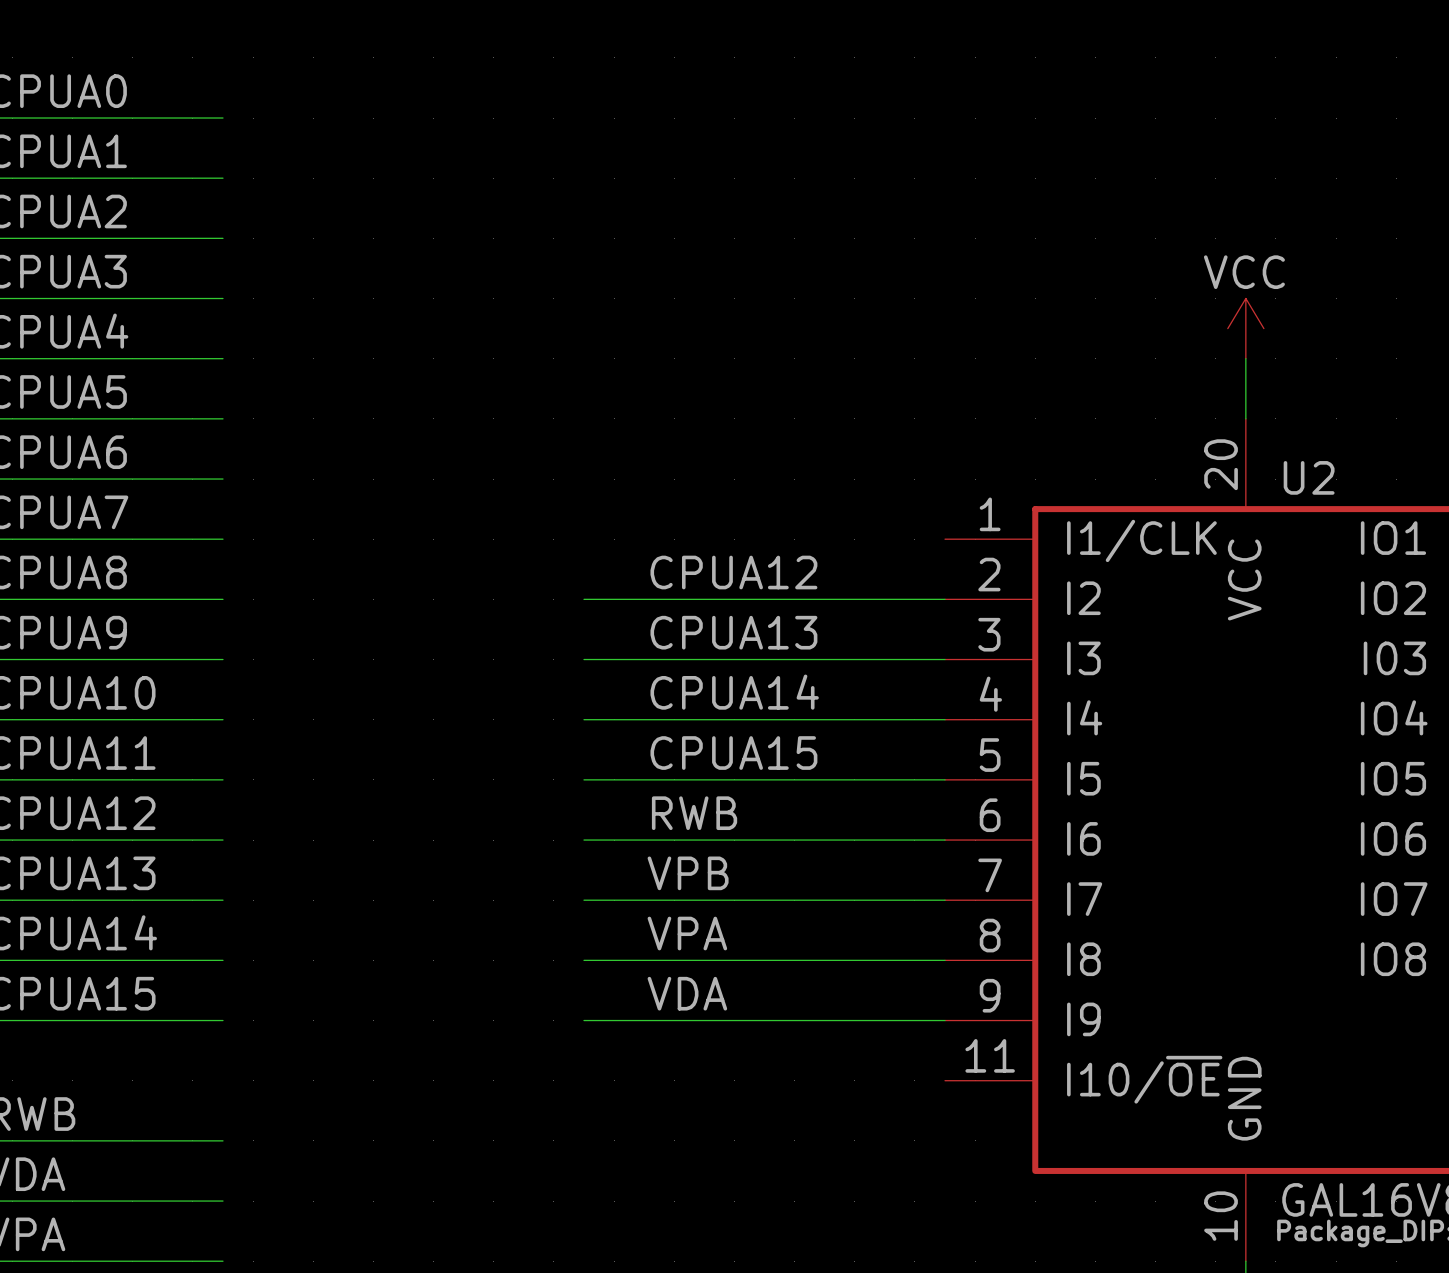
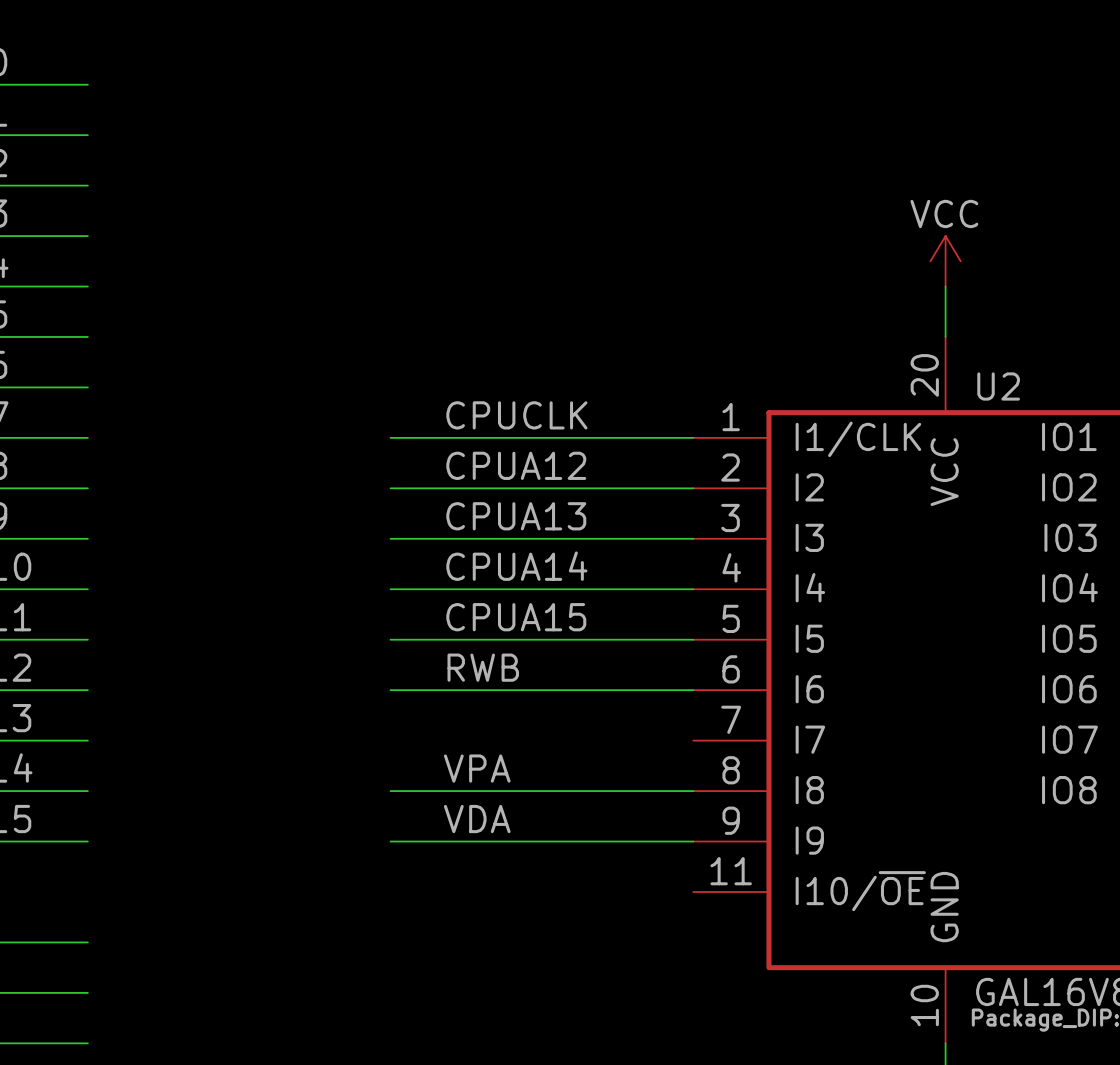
label: none -> CPUCLK (516, 415)
label: VPB (688, 873) -> none
wire: (584, 900) (945, 900) -> (390, 437) (693, 437)

